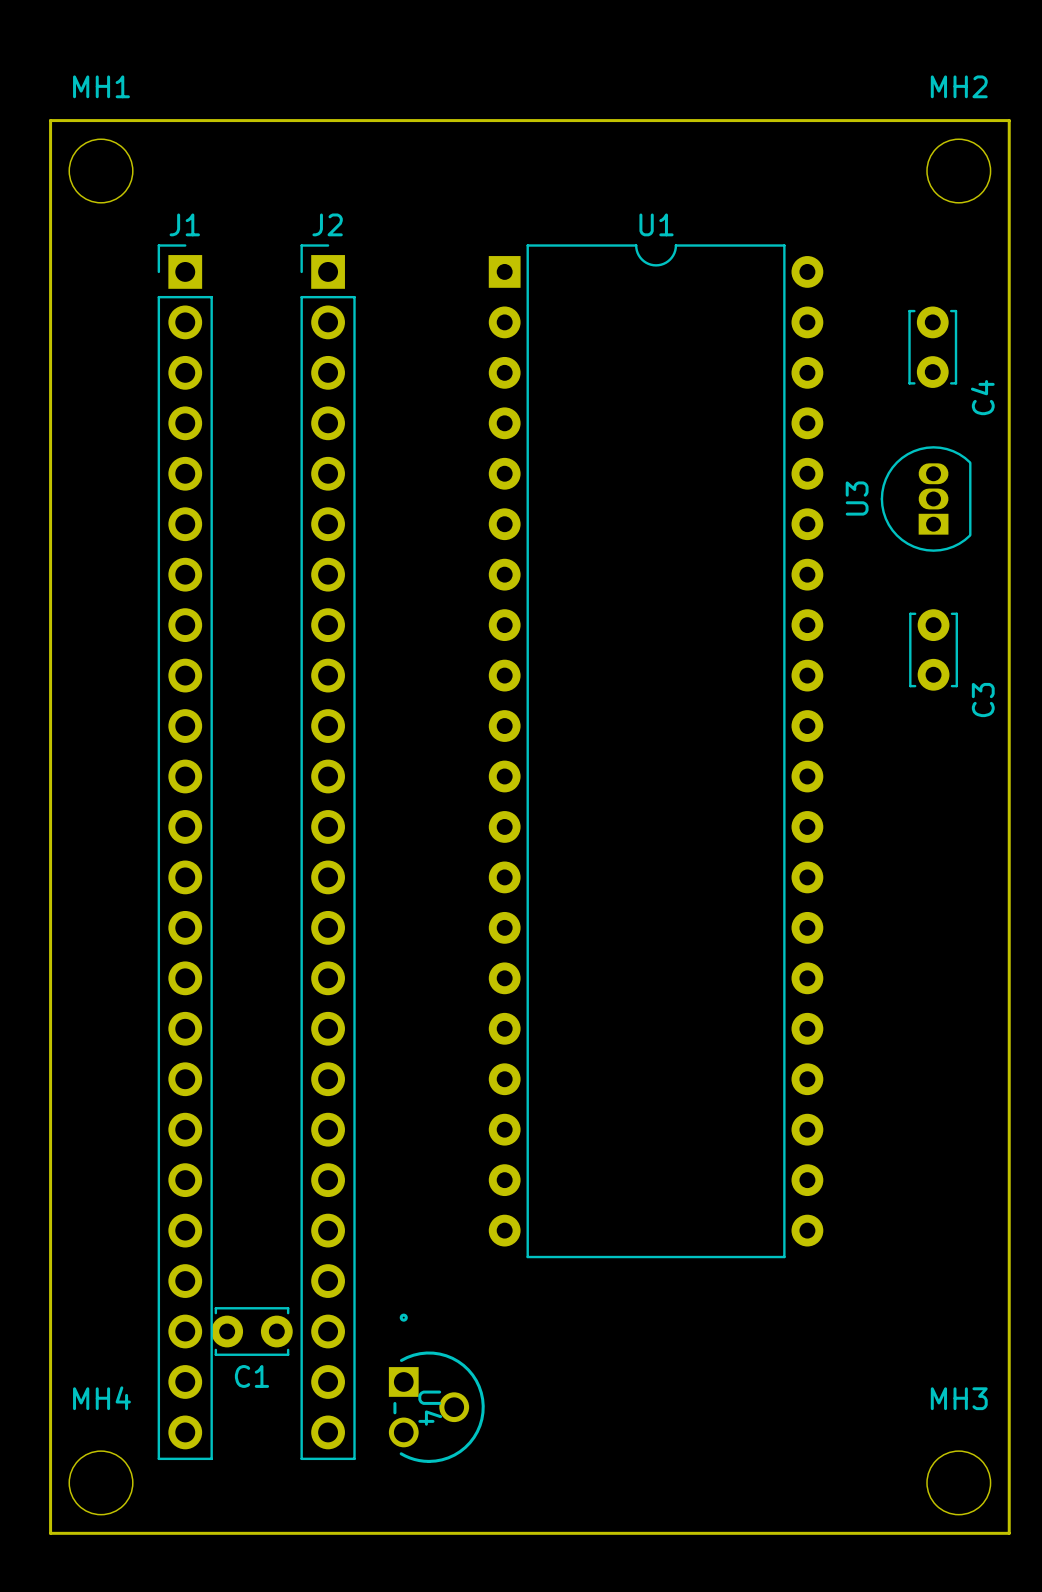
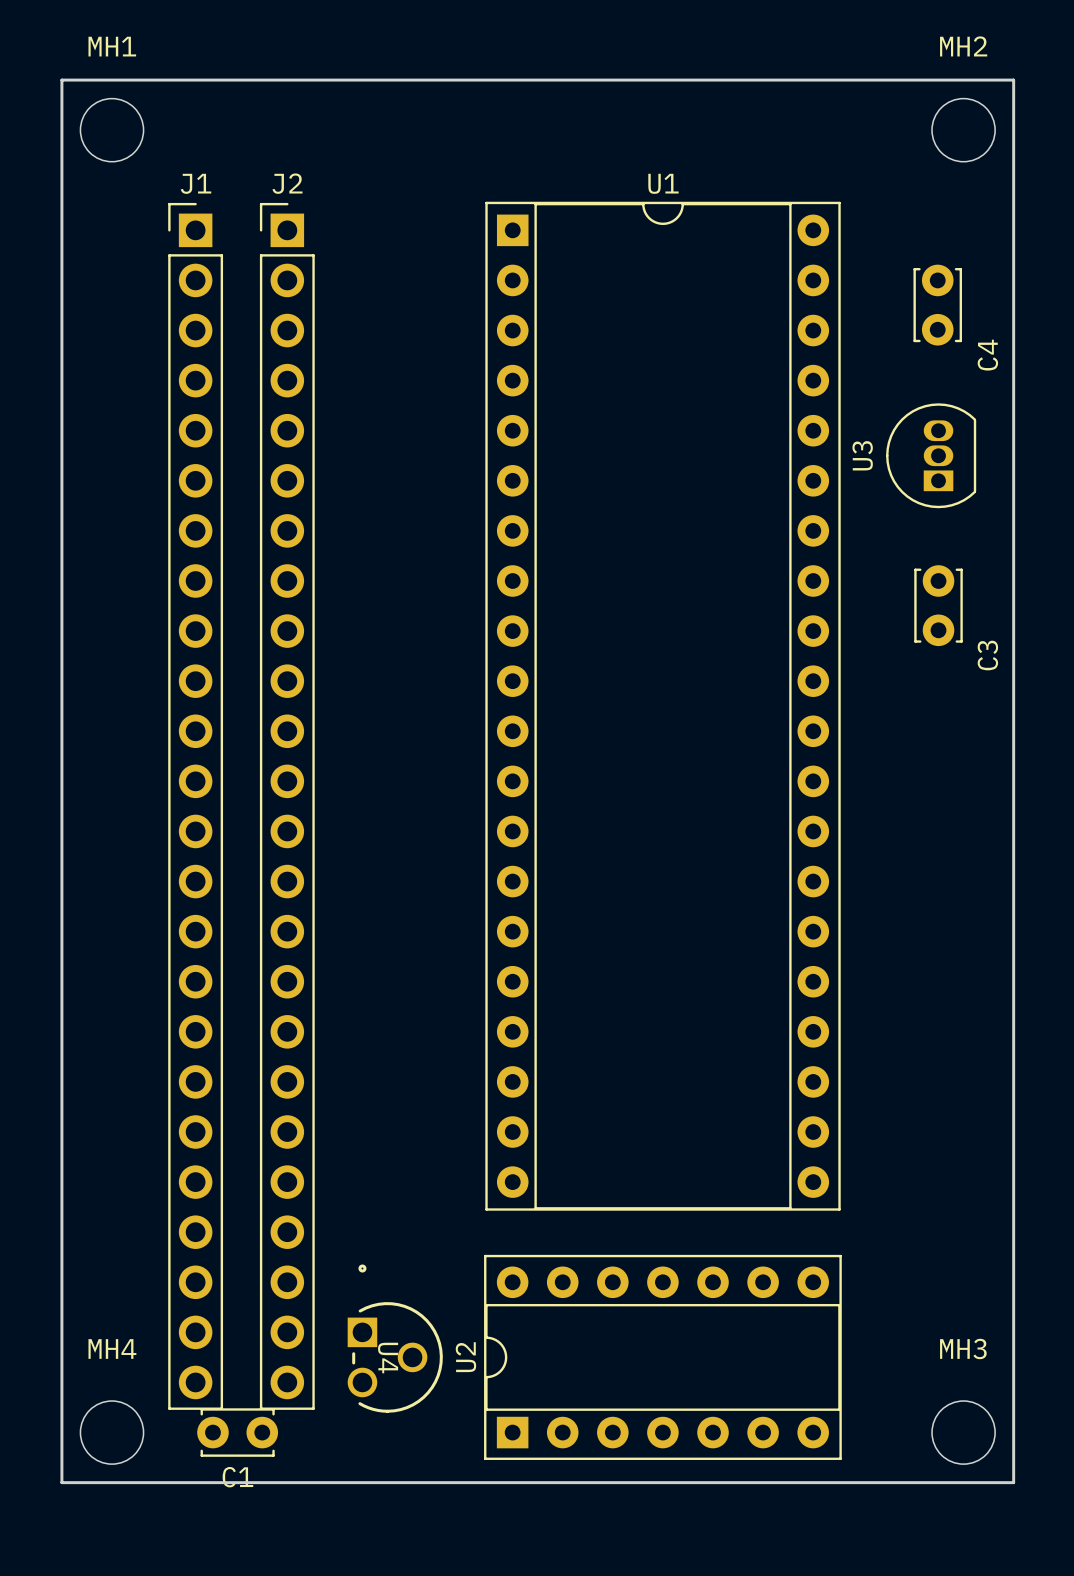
U1 footprint: [488, 244, 824, 1259] -> [485, 201, 841, 1211]
J2 position: (328, 852) -> (287, 806)
C1 position: (252, 1331) -> (237, 1432)
U4 position: (436, 1388) -> (395, 1338)
U2: none -> (662, 1357)

